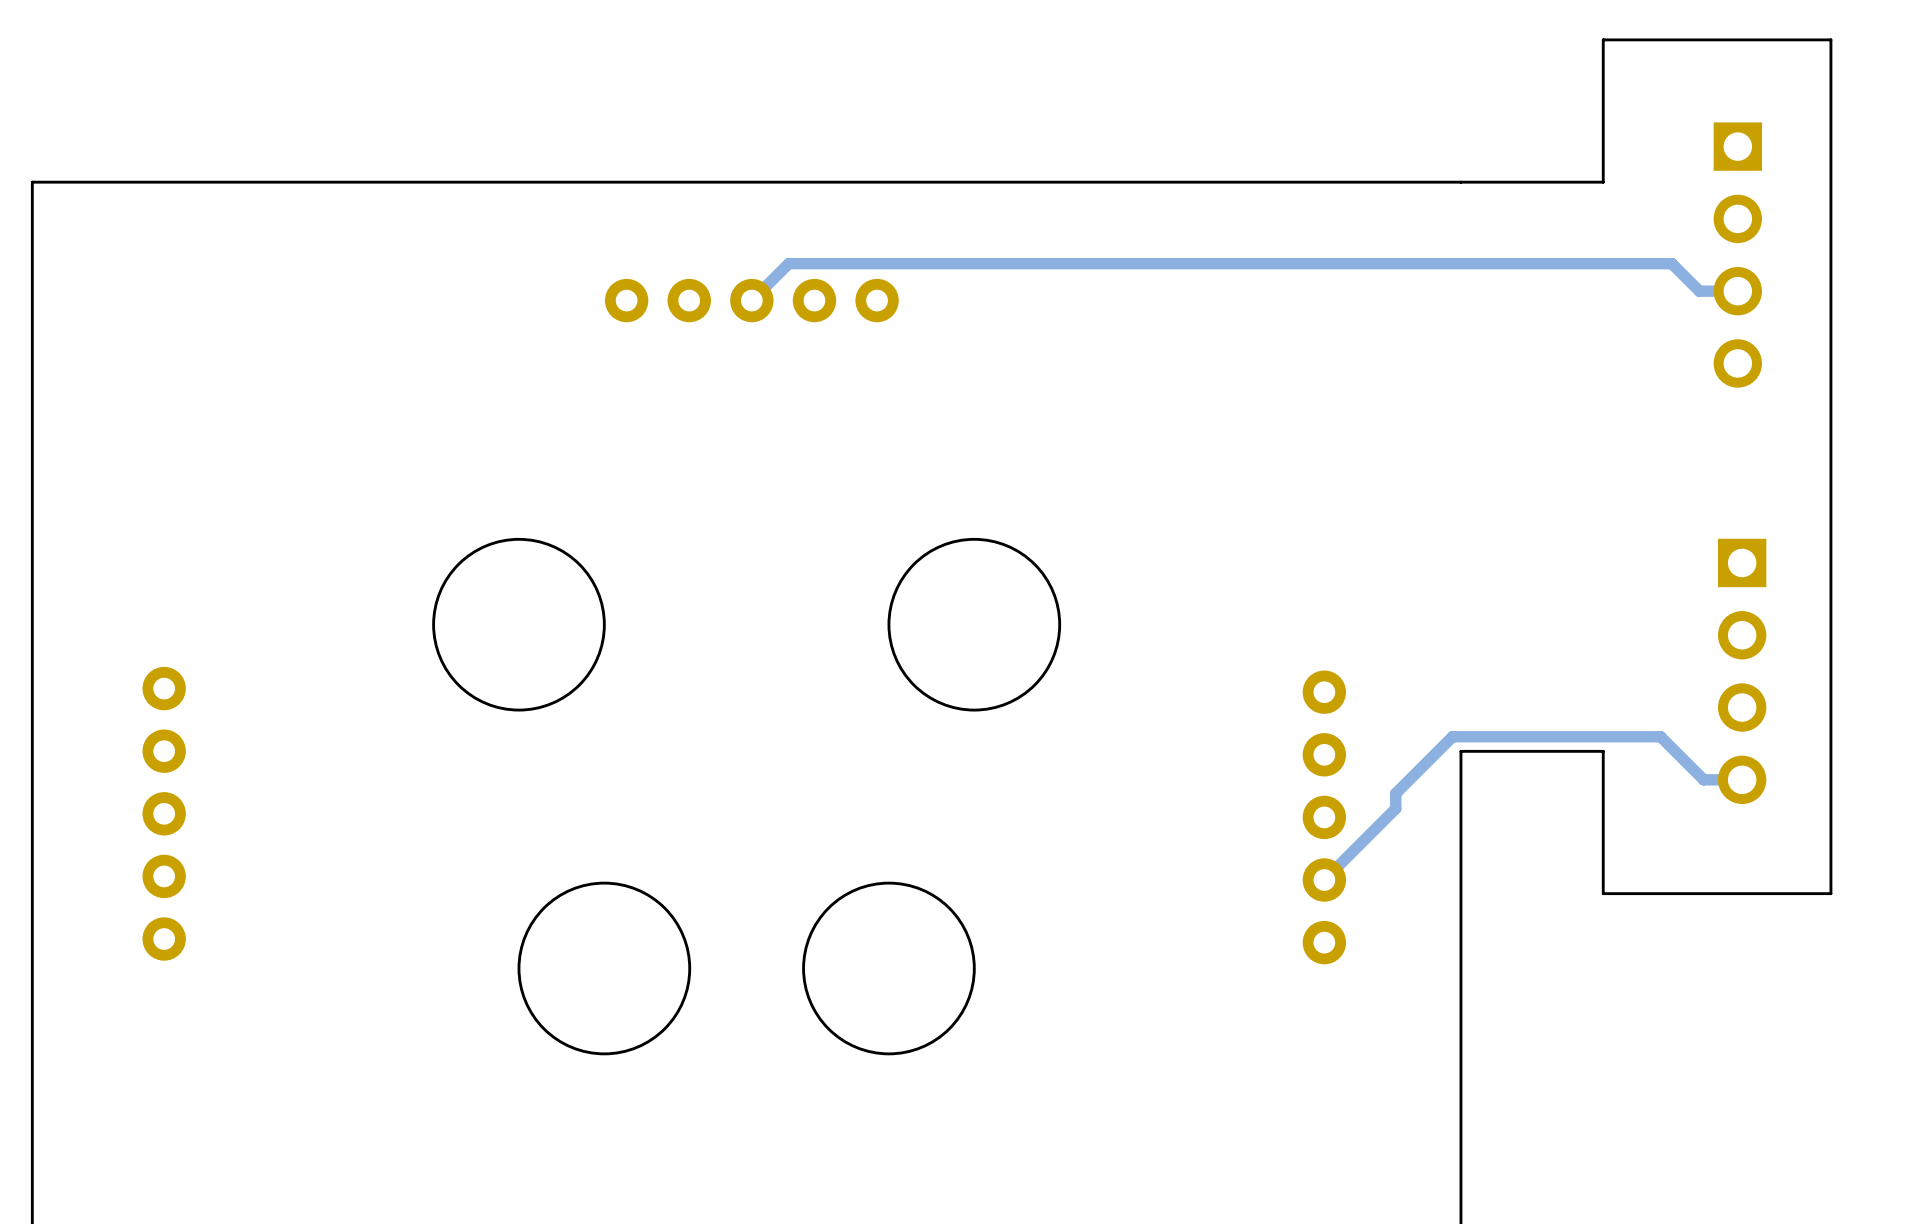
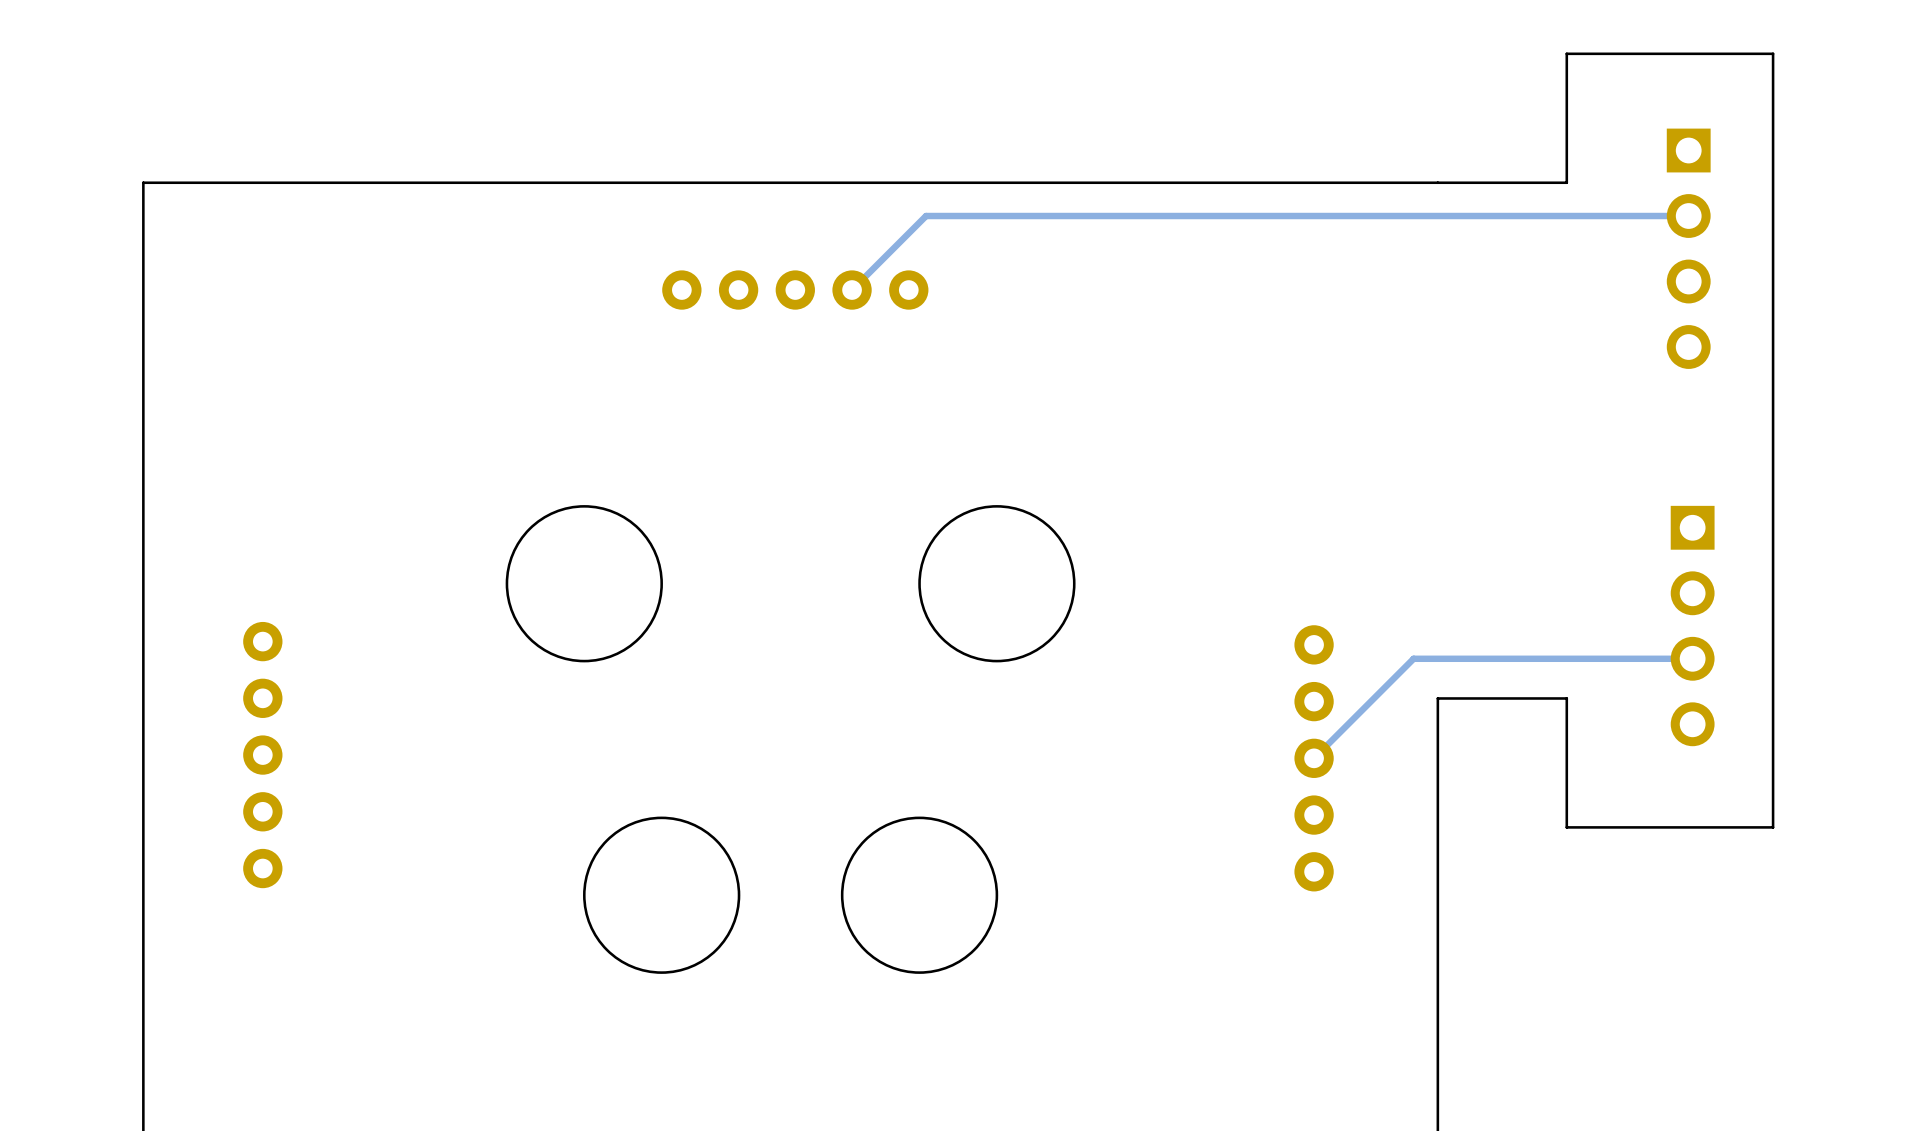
track: none -> (1688, 216) (926, 216) (852, 290)
track: (1737, 291) (1699, 291) (1671, 263) (788, 263) (751, 300) -> none
track: none -> (1692, 658) (1413, 658) (1314, 758)
track: (1742, 779) (1703, 779) (1660, 736) (1452, 736) (1395, 793) (1395, 808) (1324, 880) -> none

